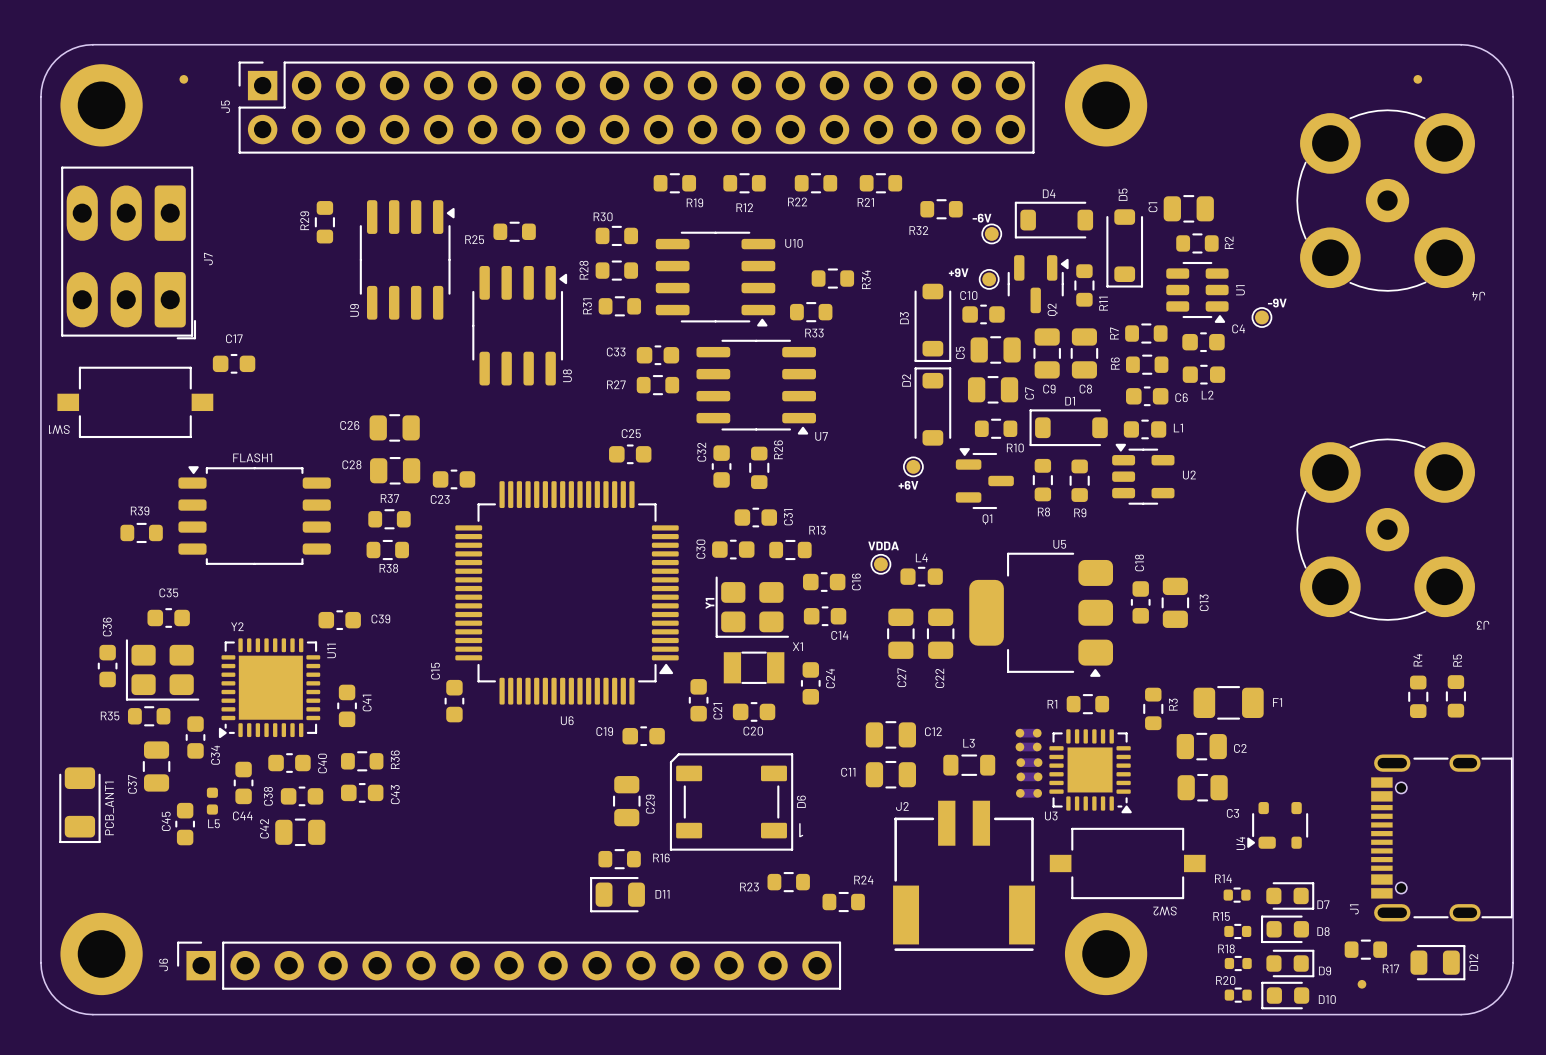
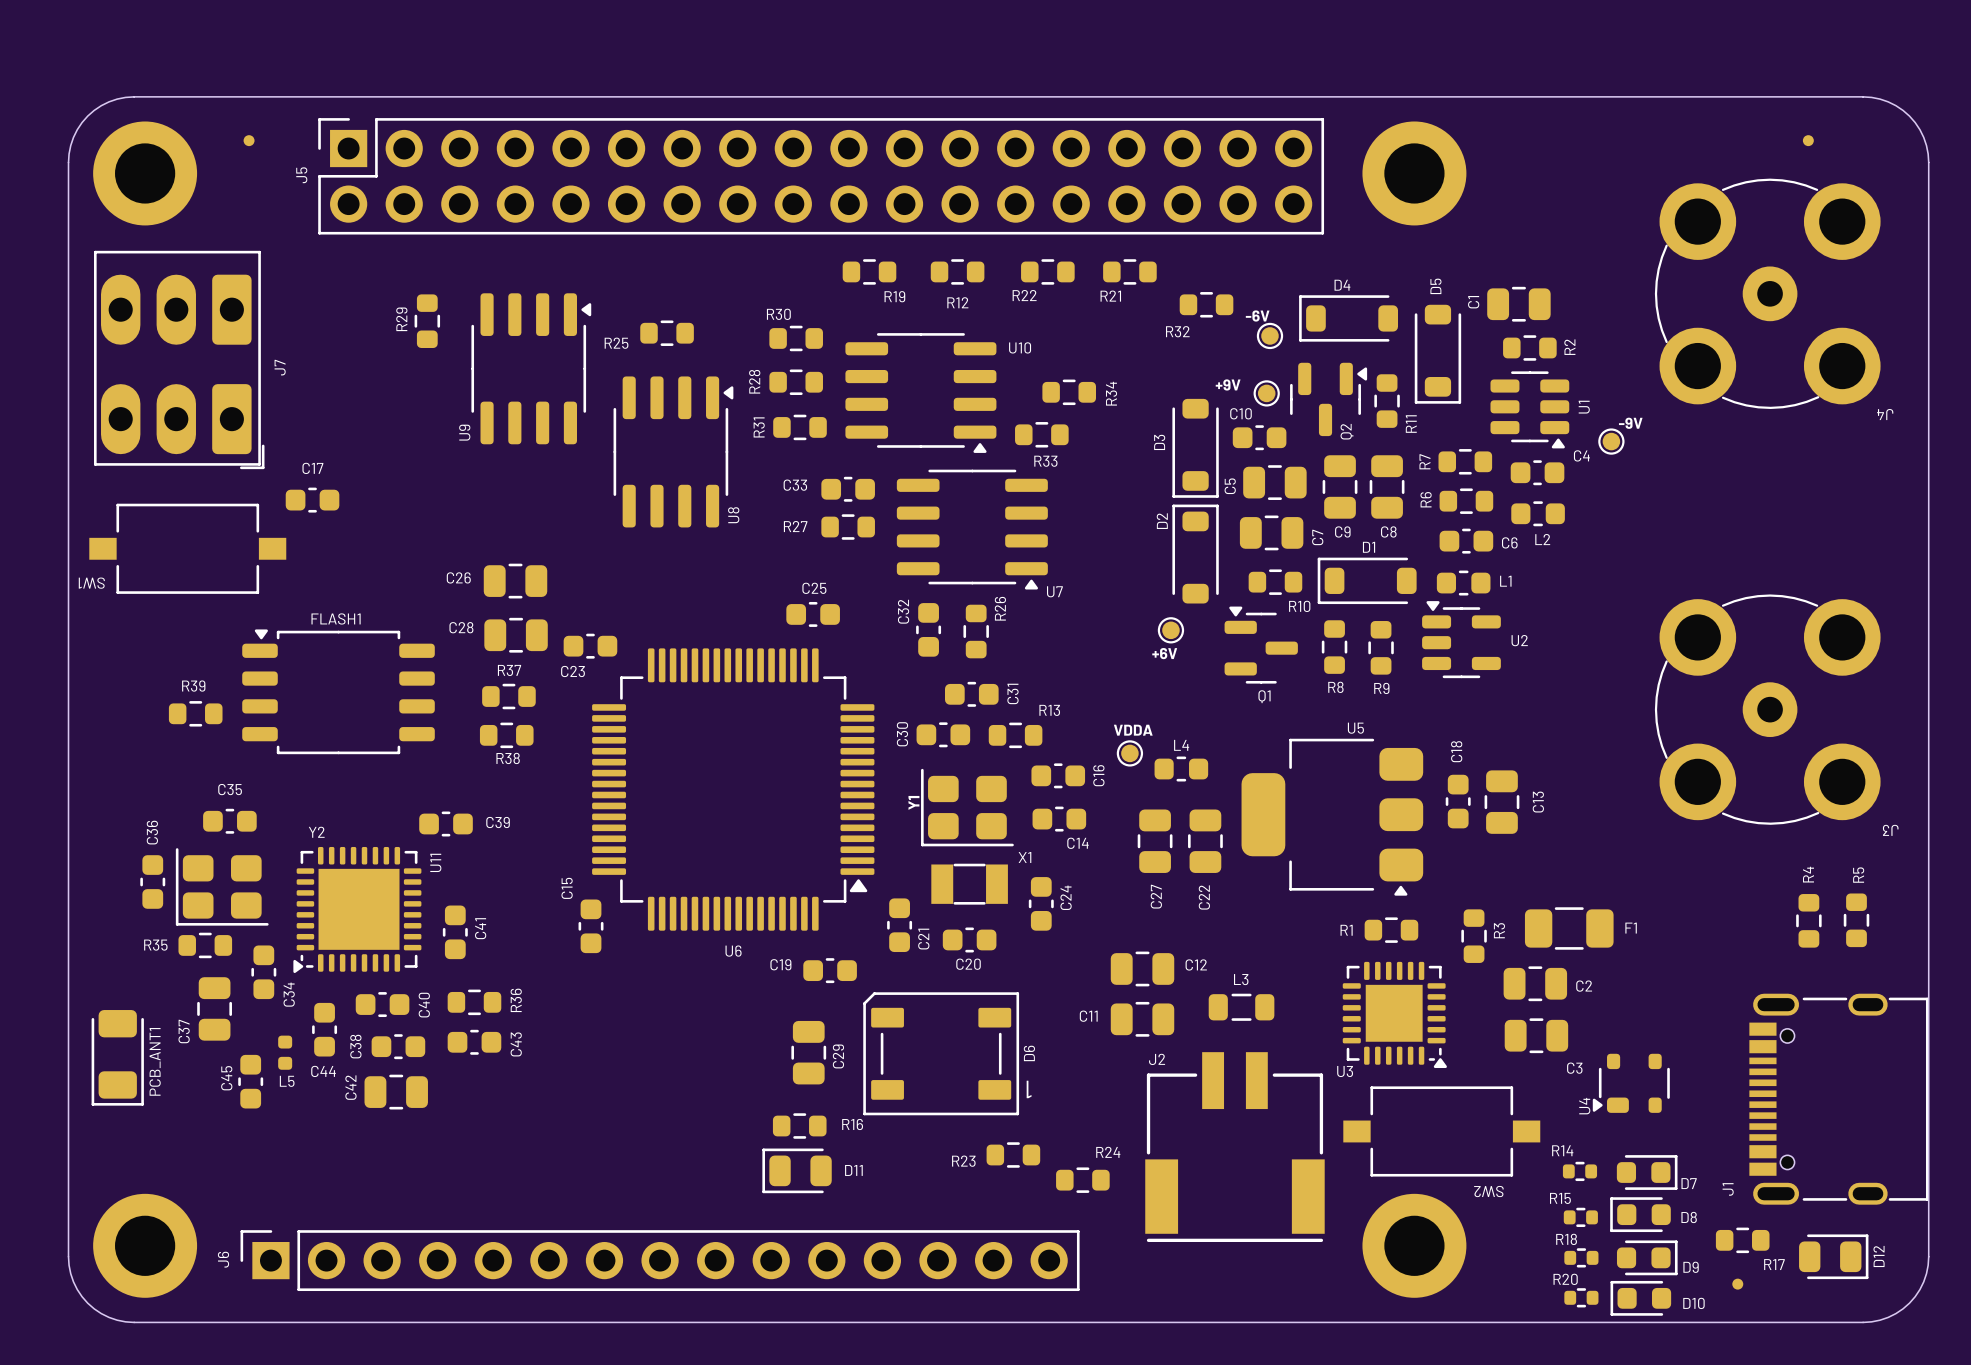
part: (1028, 733) -> none
part: (1028, 747) -> none
part: (1029, 762) -> none
part: (1029, 776) -> none
part: (1029, 793) -> none

